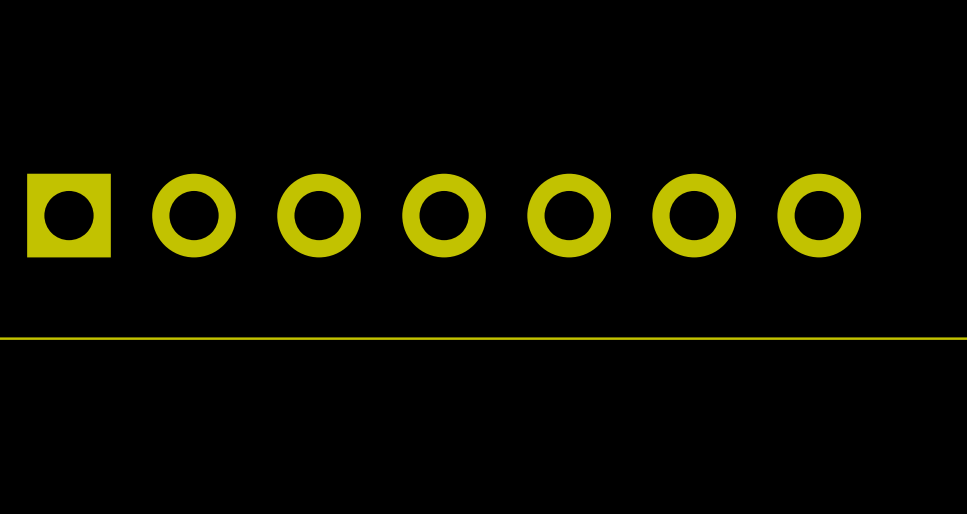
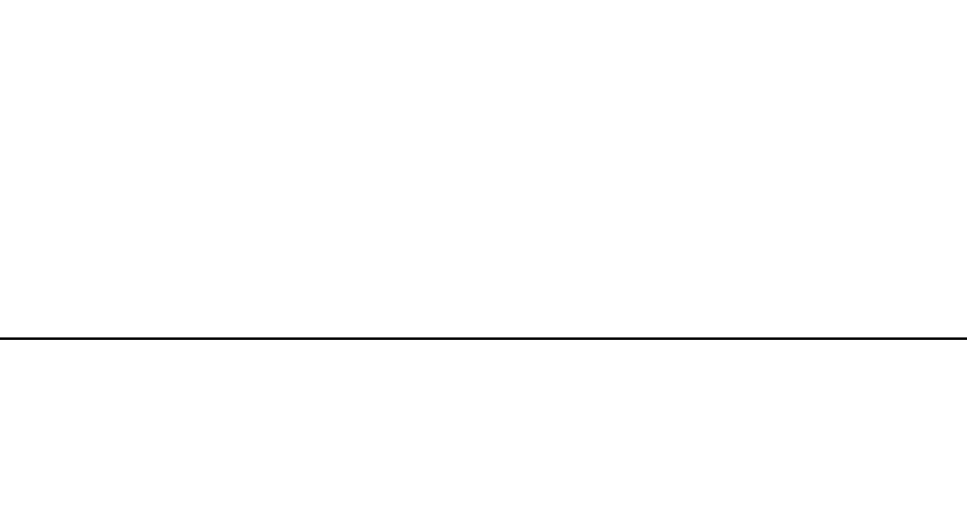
part: (444, 215) -> none

